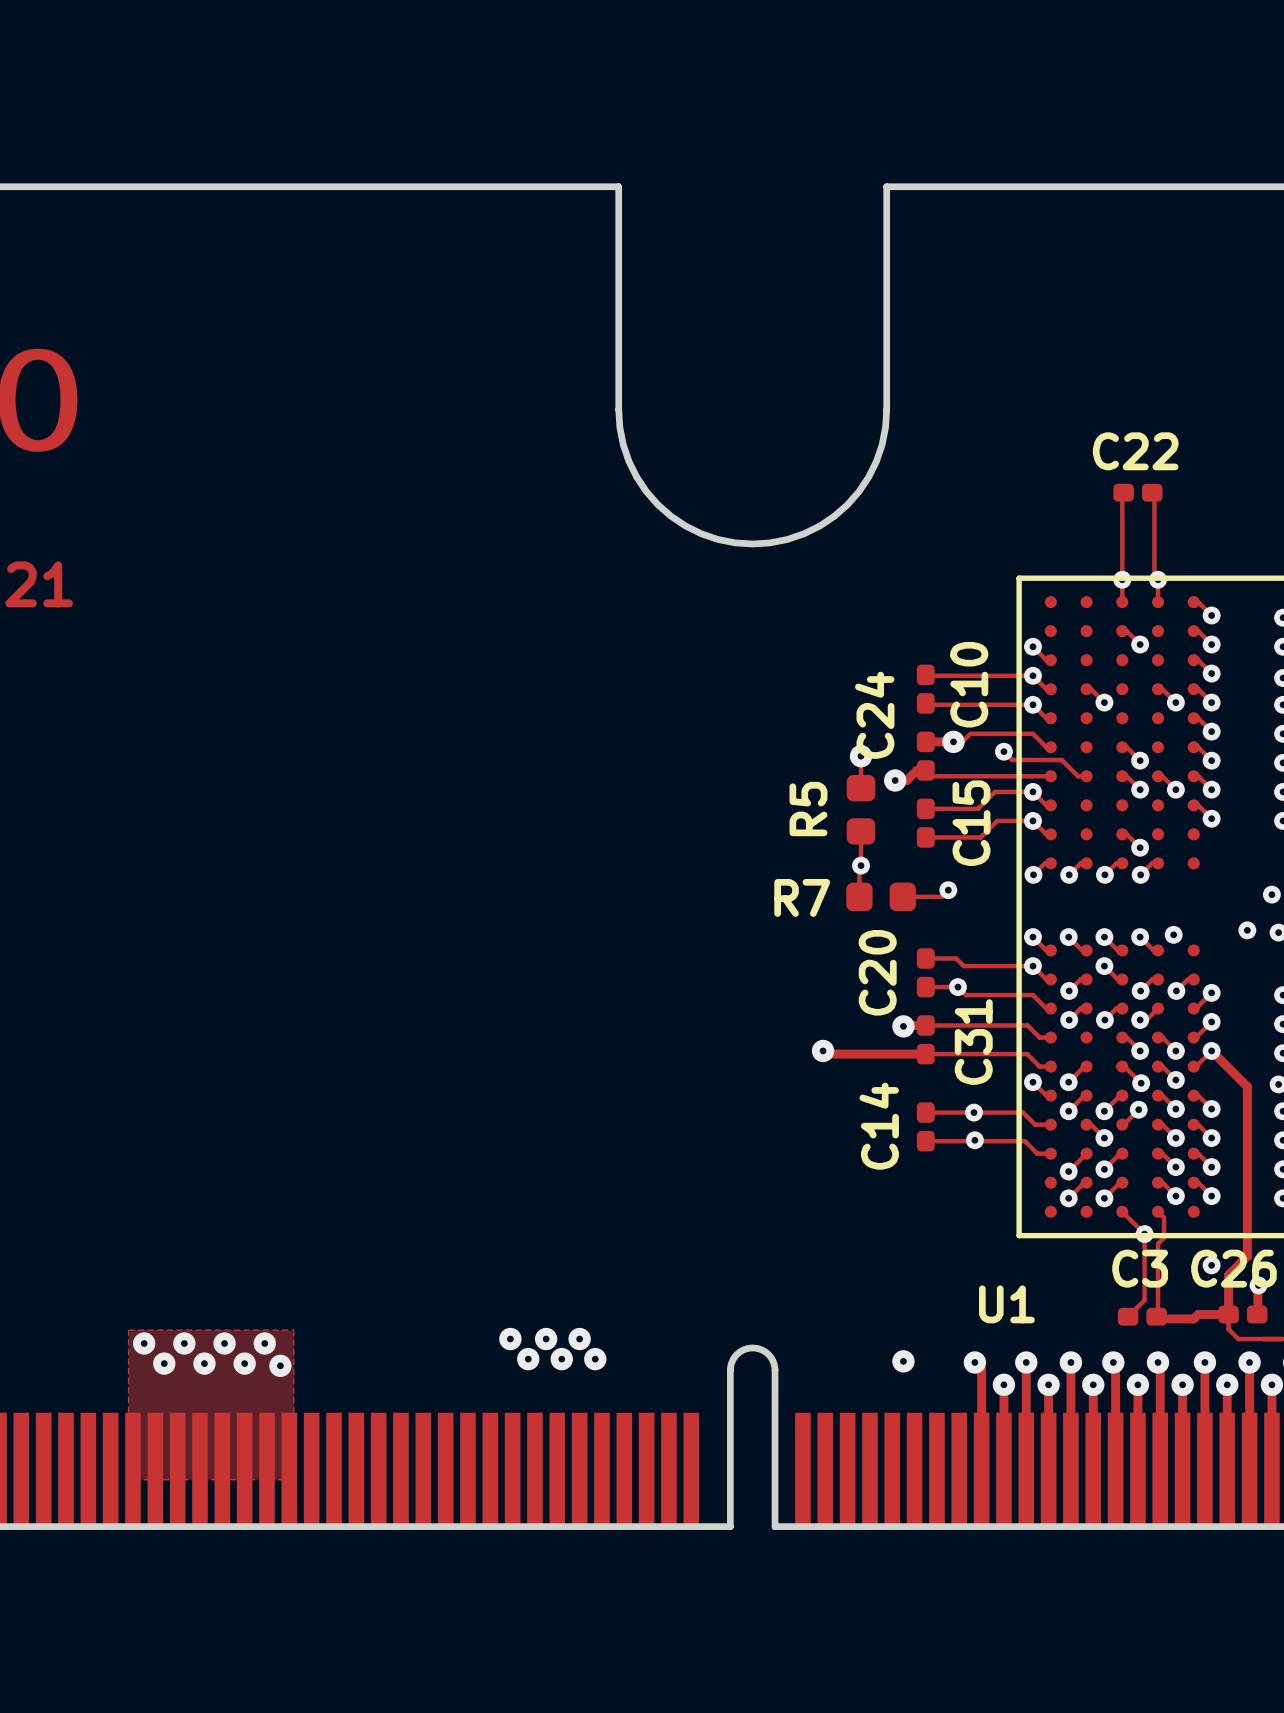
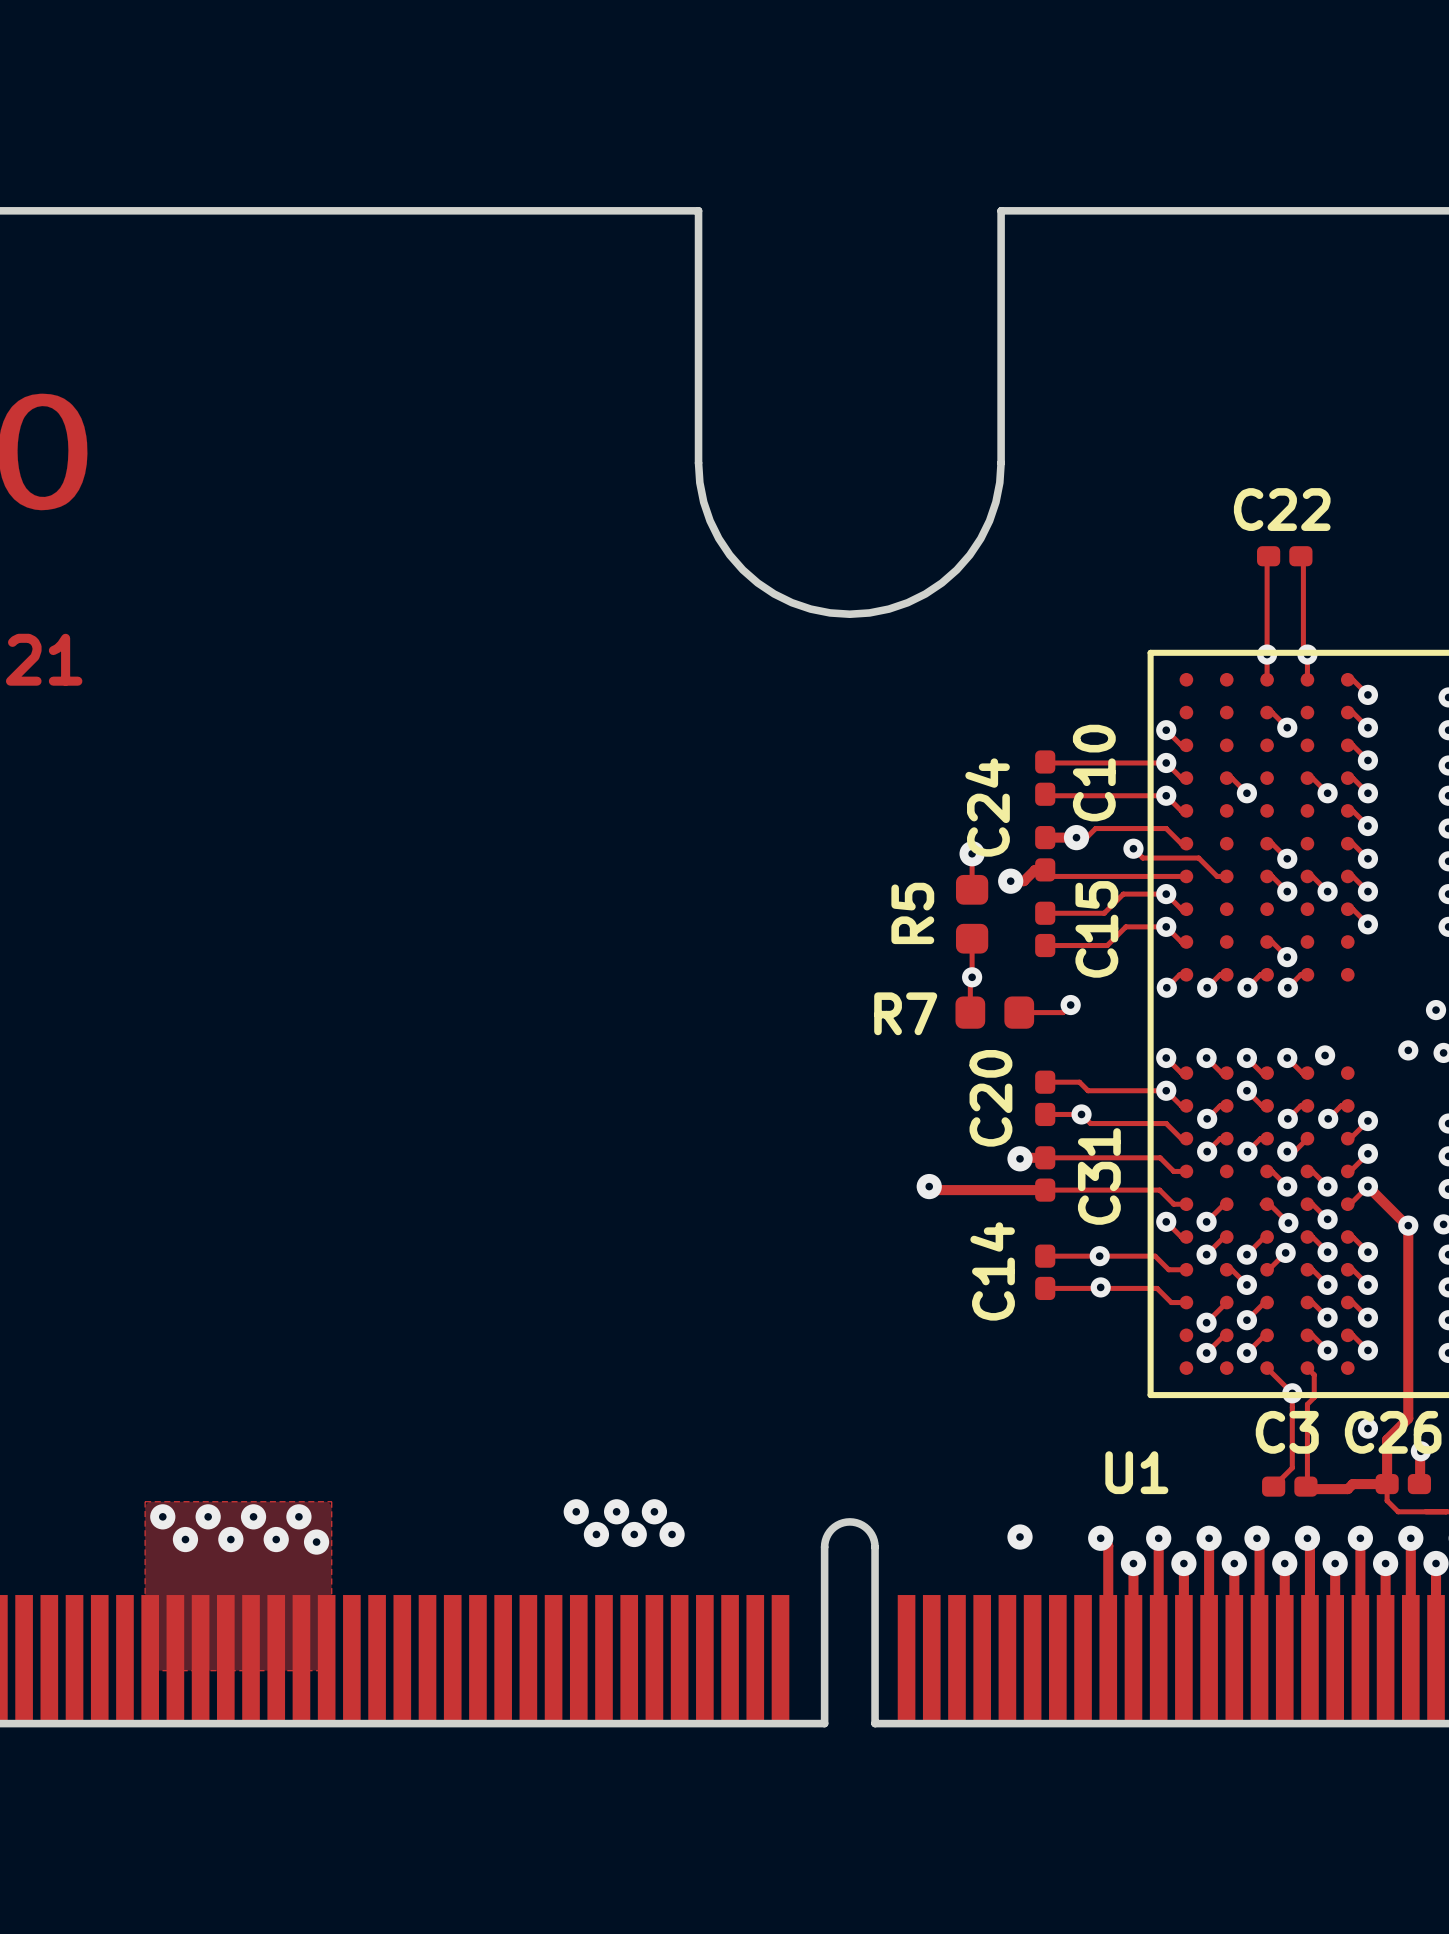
via: none -> (1408, 1225)

